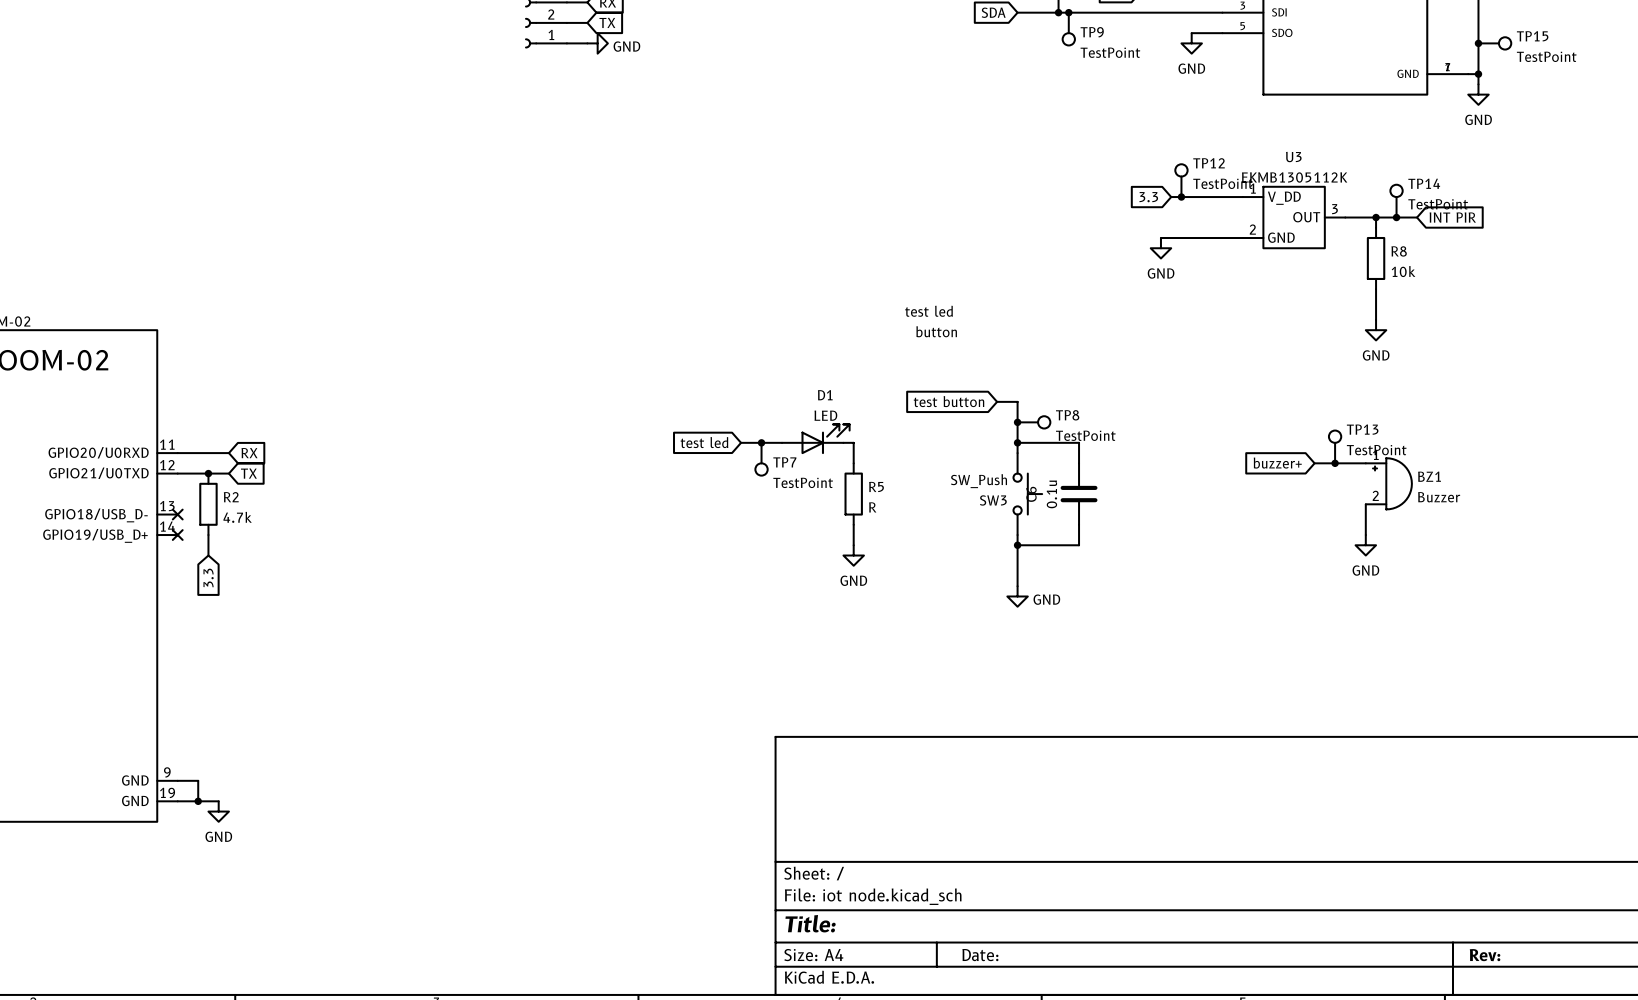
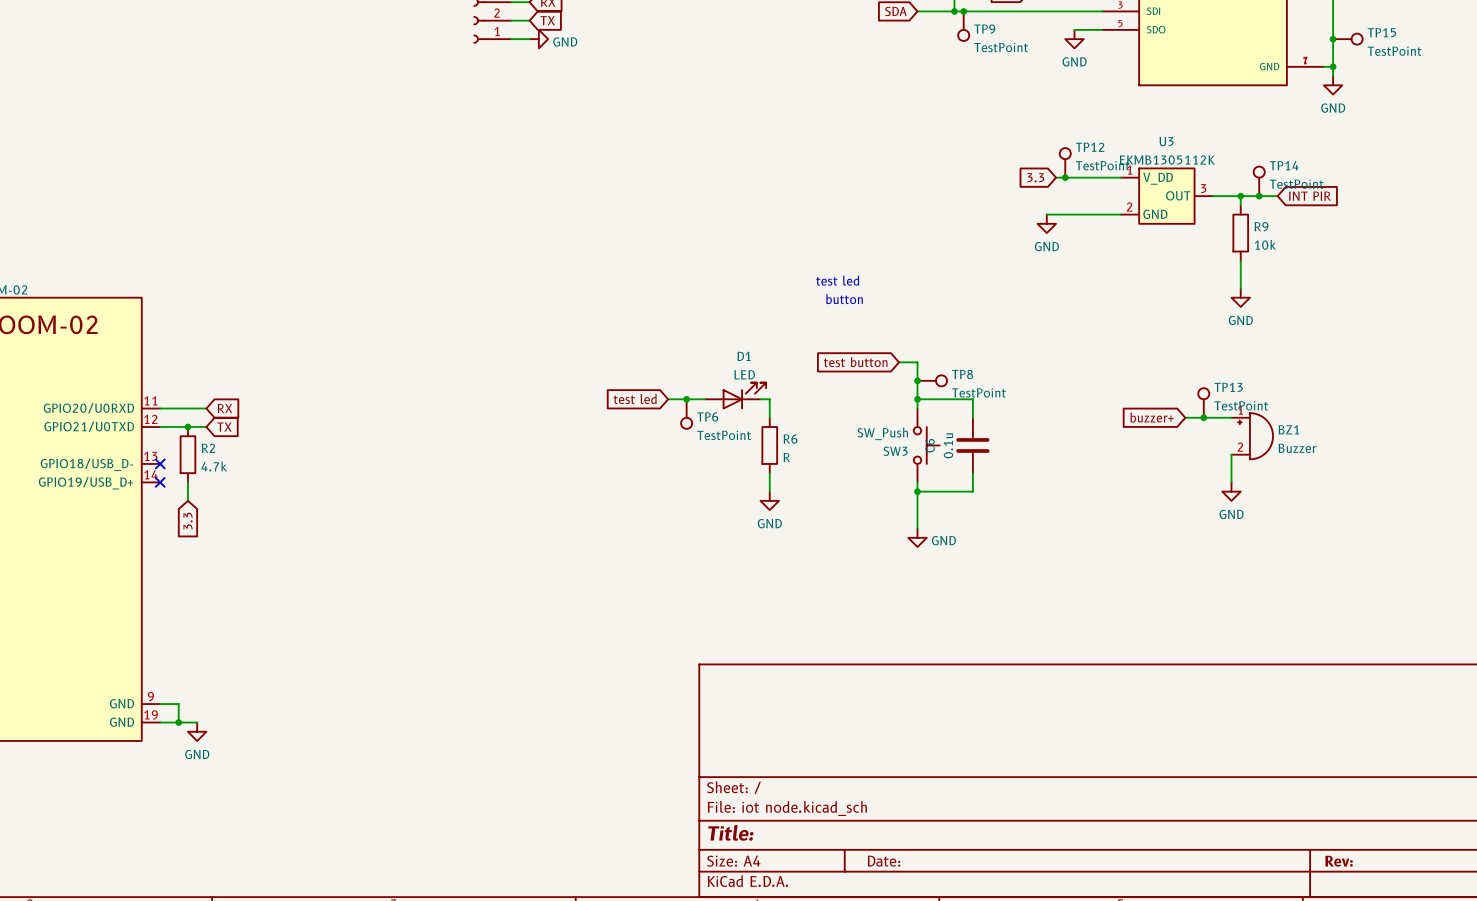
R8 name: R8 (1399, 251) -> R9 (1261, 226)
TP7 name: TP7 (784, 462) -> TP6 (707, 416)
R5 name: R5 (876, 486) -> R6 (790, 439)

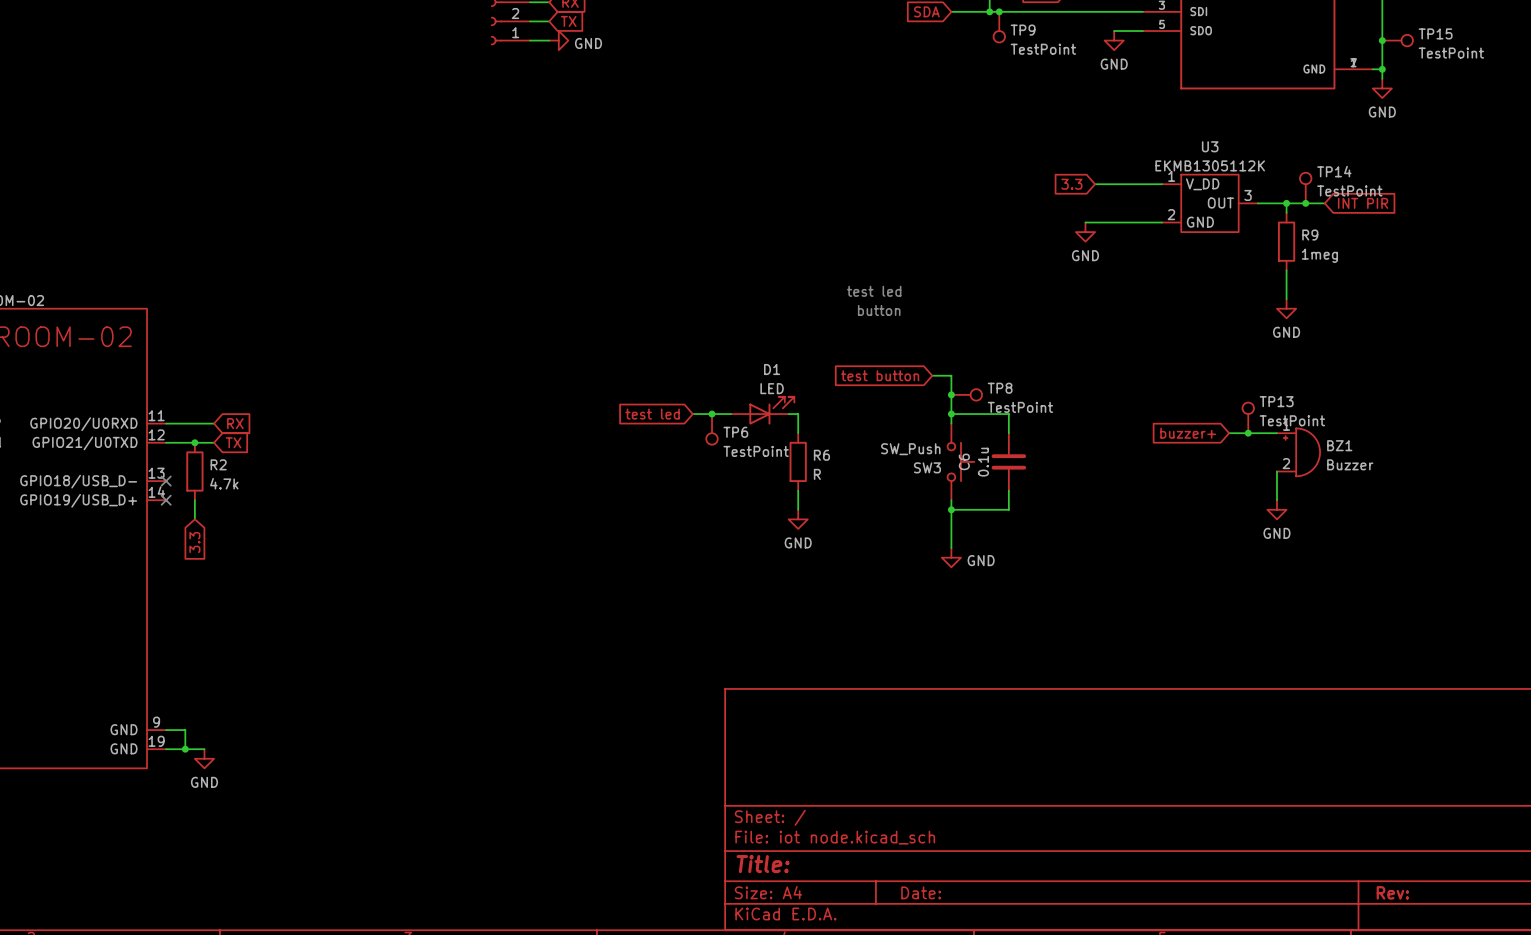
TP12: TestPoint (1065, 162) -> none
junction: (1065, 177) -> none
R9 value: 10k (1265, 244) -> 1meg (1319, 255)

